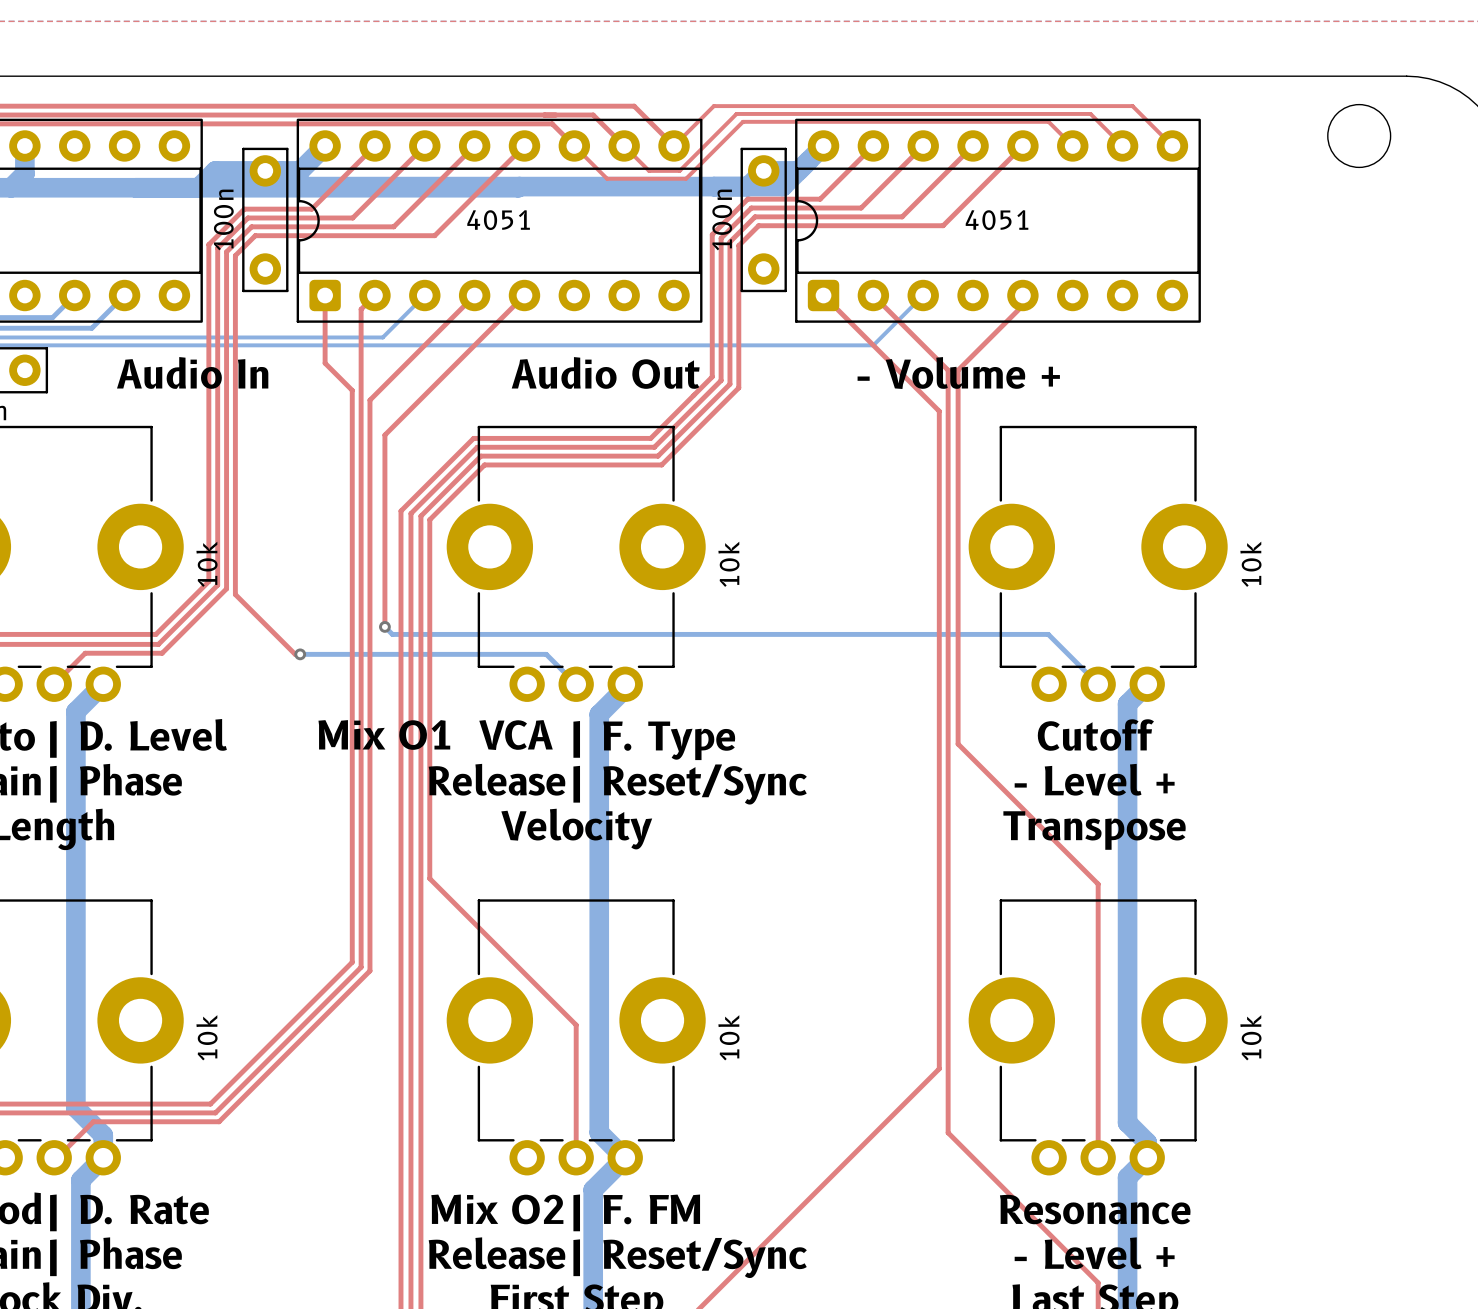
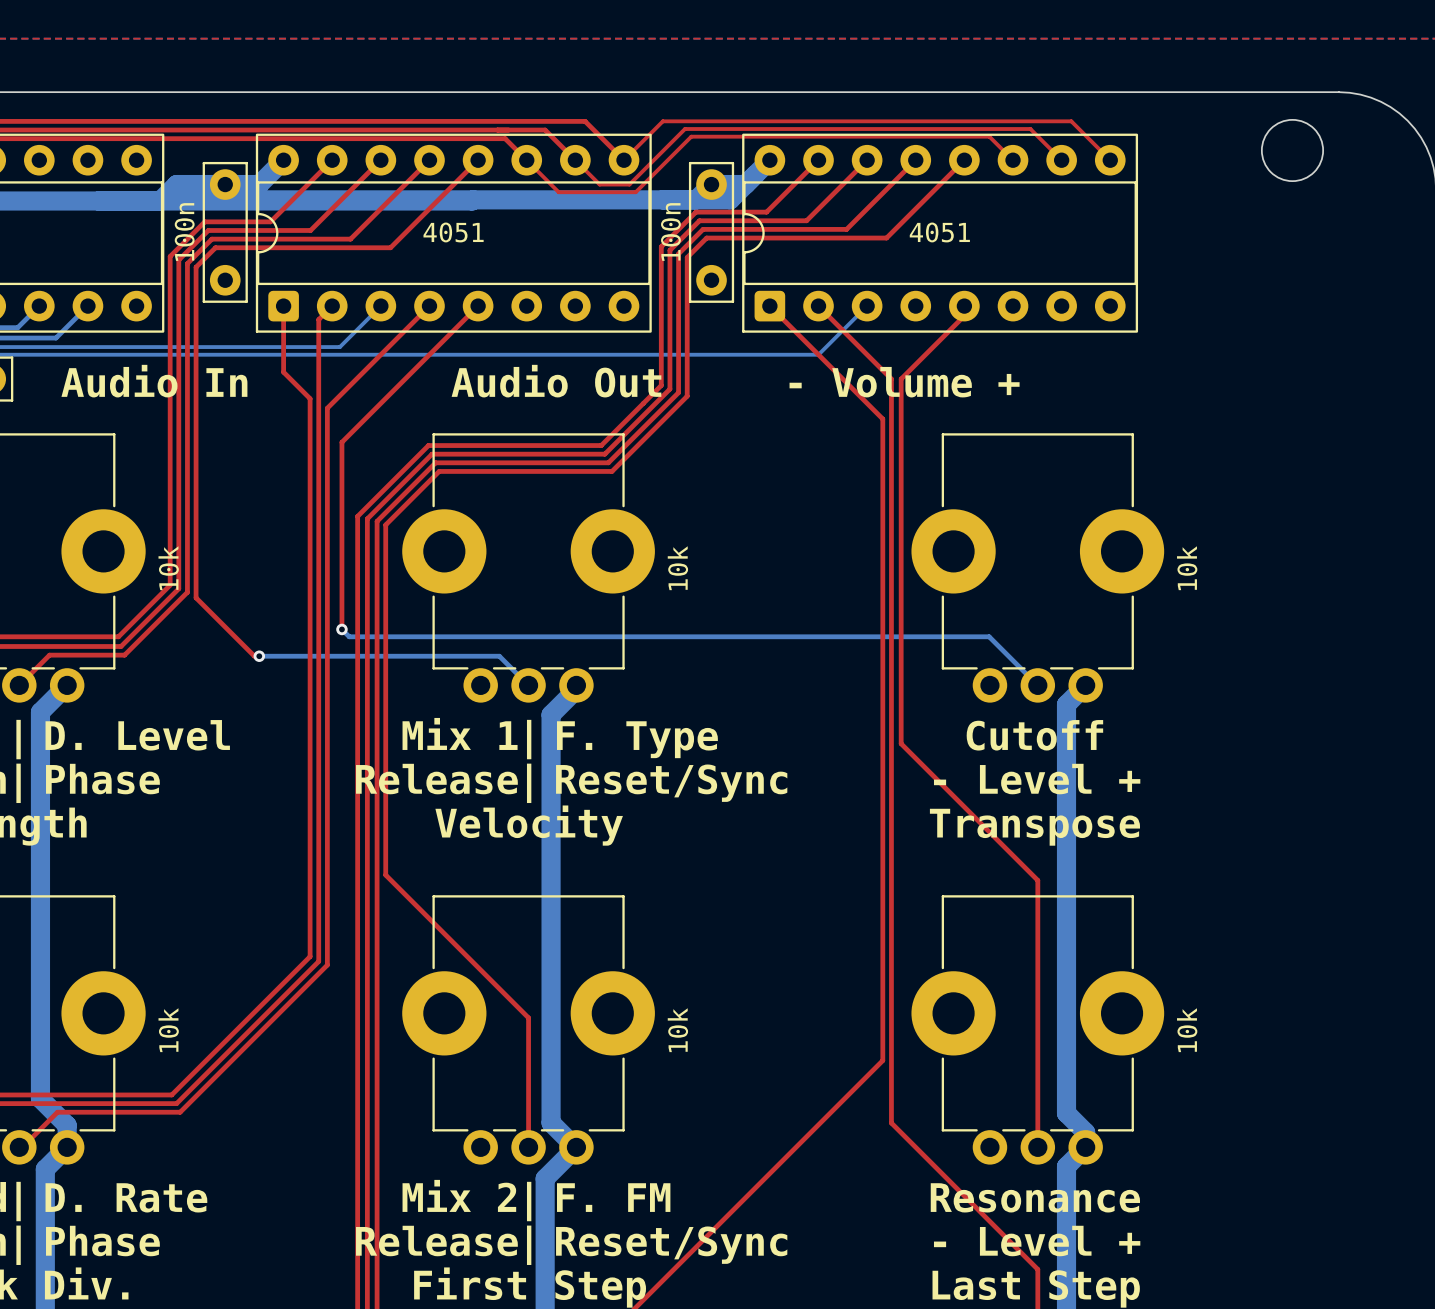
text: Mix O1 (384, 734) -> none
text: VCA (516, 735) -> Mix 1 (460, 733)
text: Mix O2 (497, 1209) -> Mix 2 (459, 1195)

